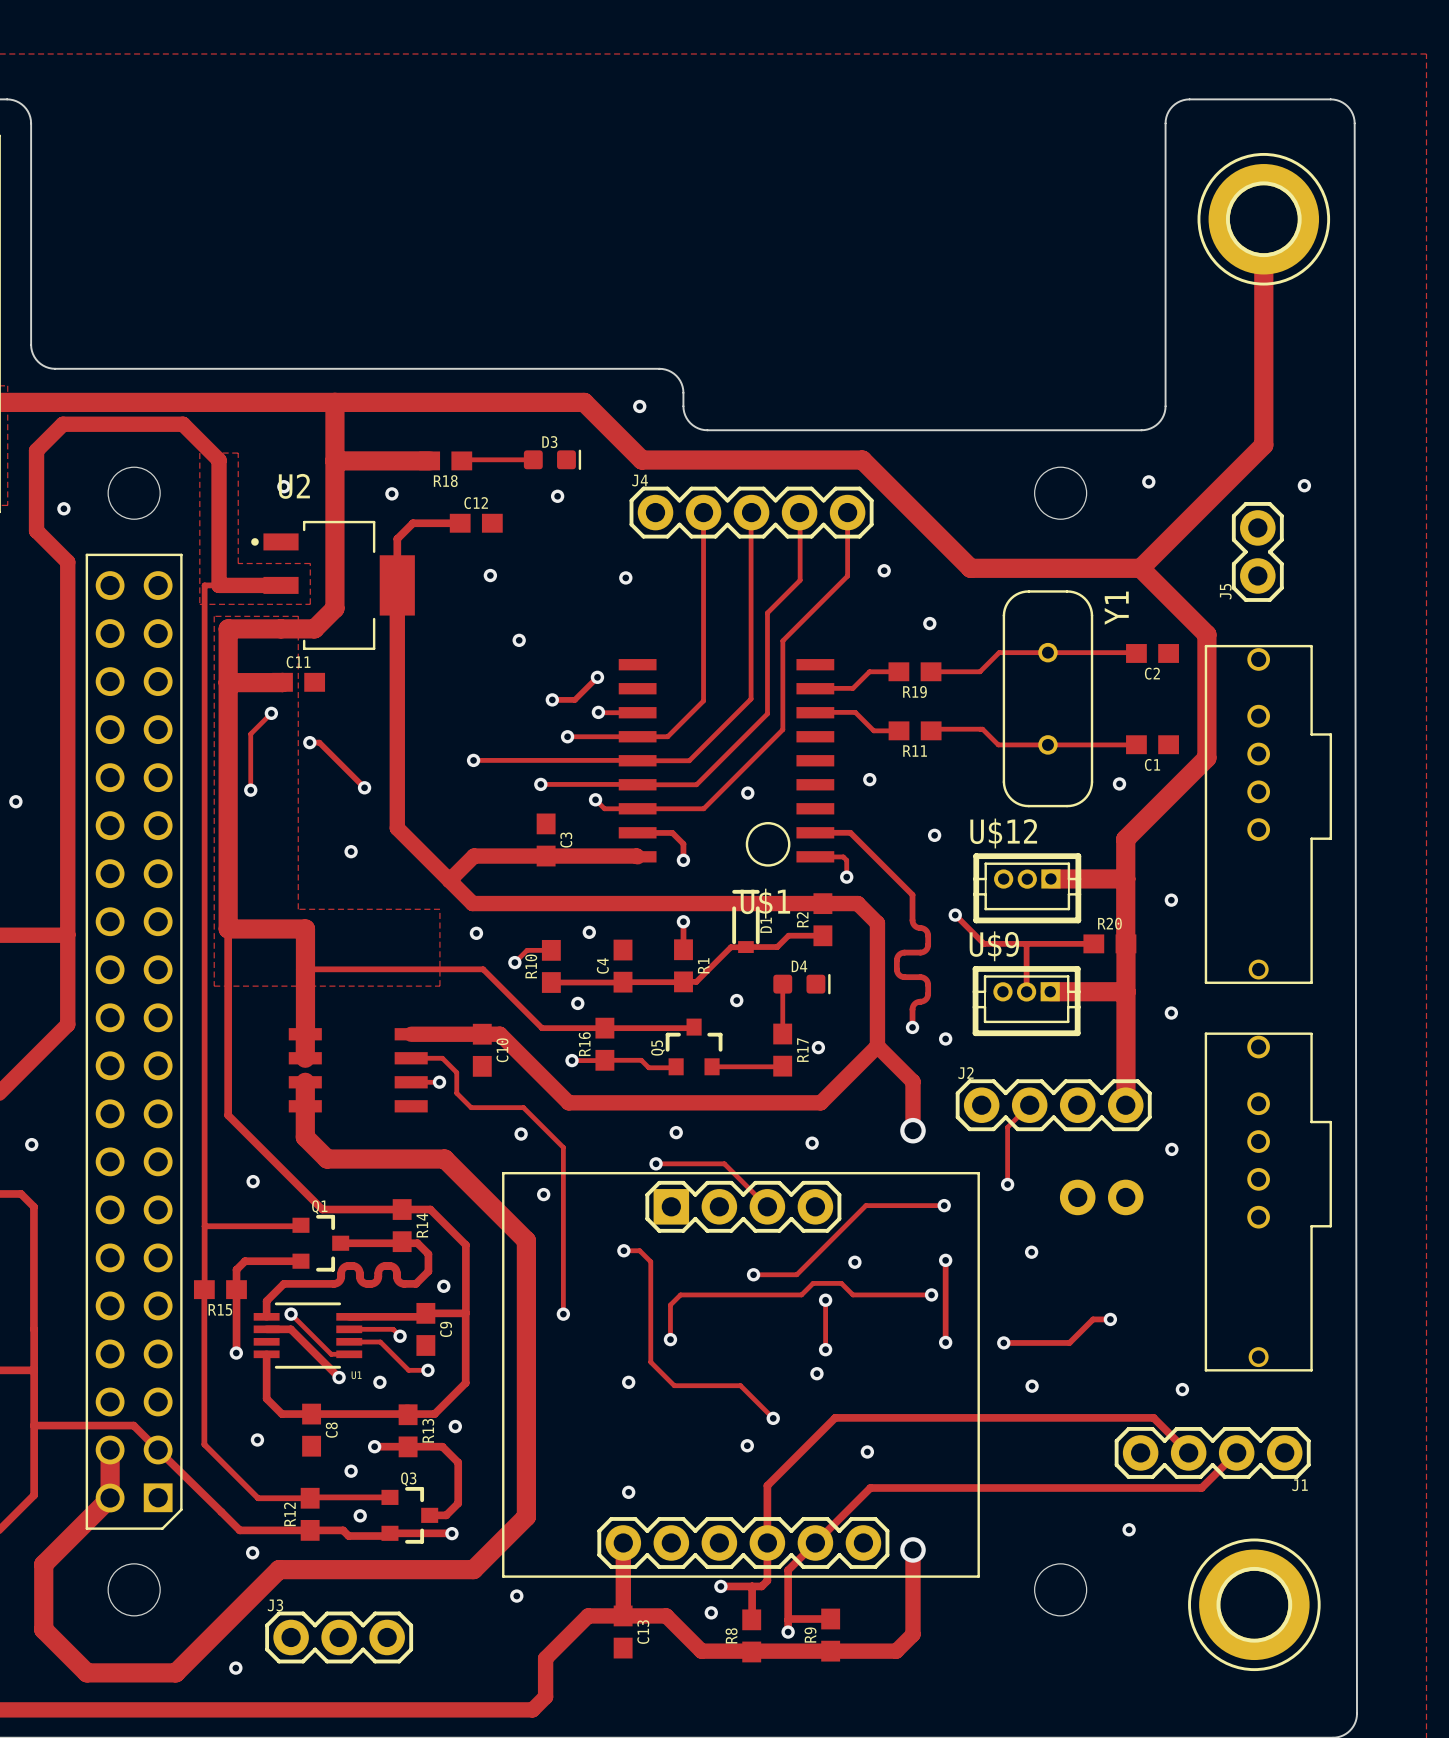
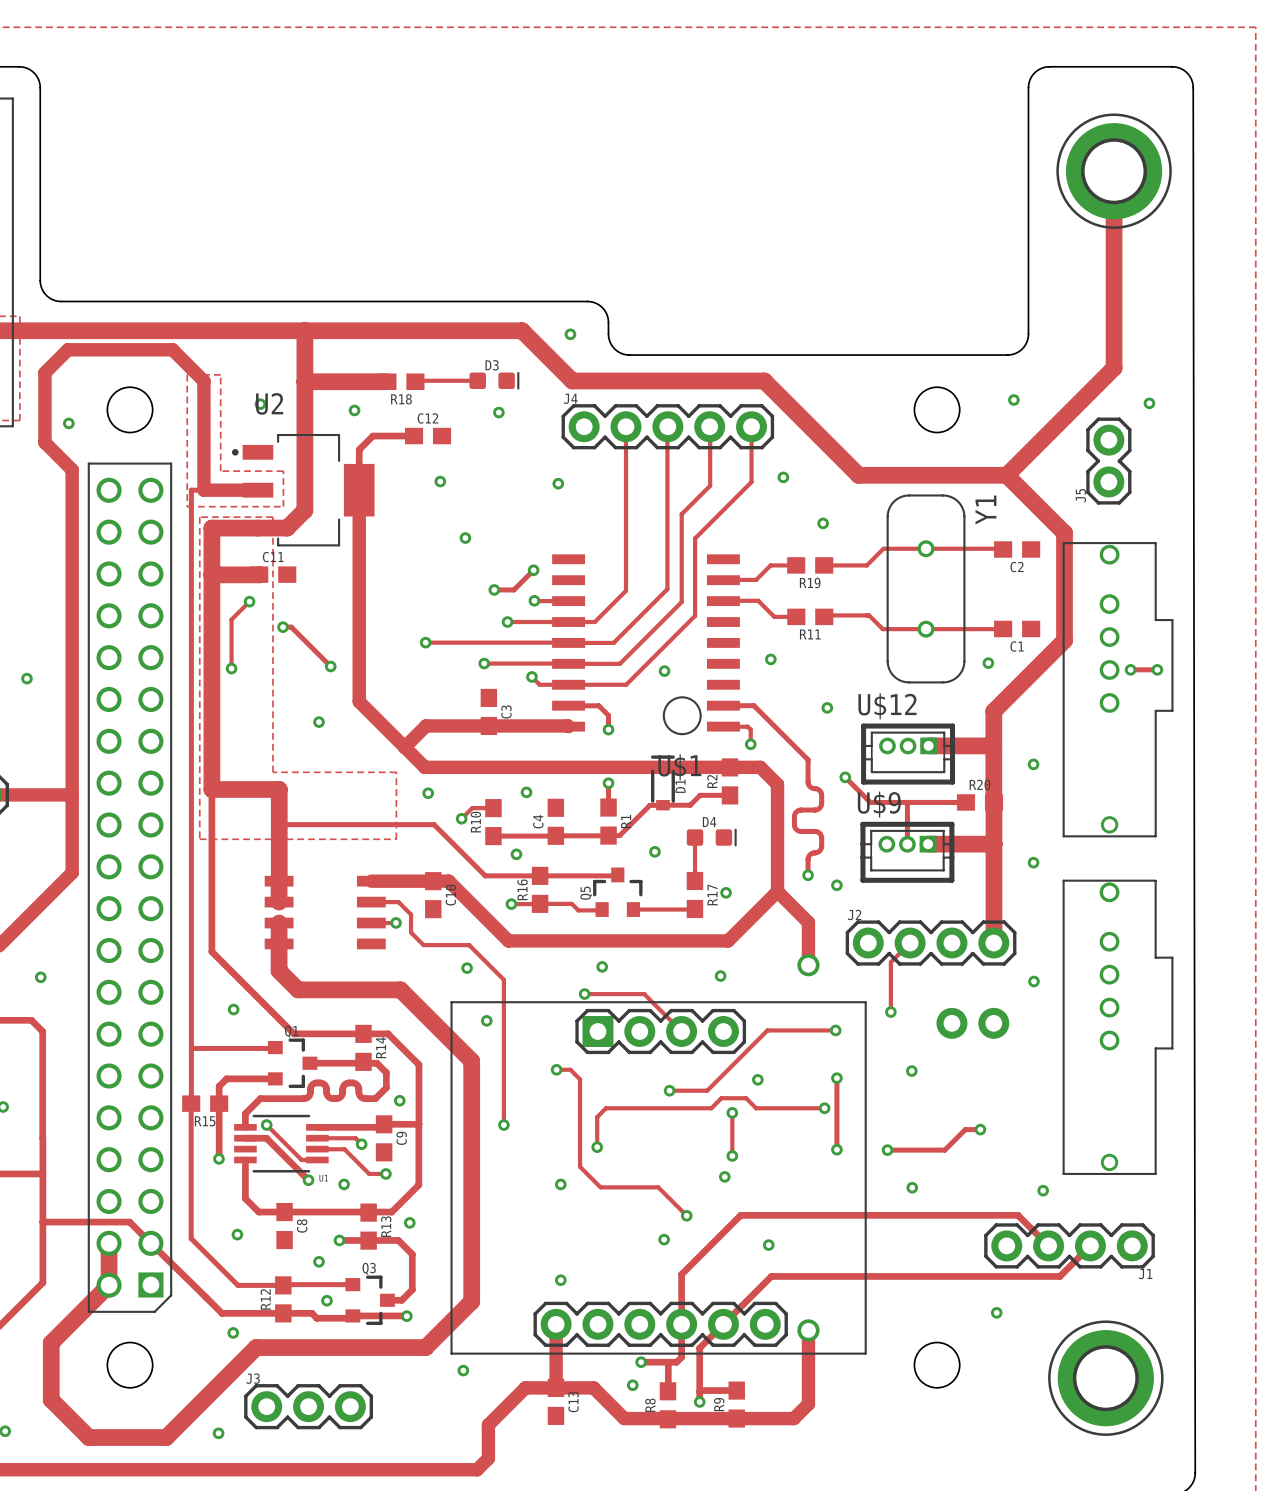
track: none -> (1130, 669) (1157, 669)
via: none -> (1130, 669)
via: none -> (1157, 669)

